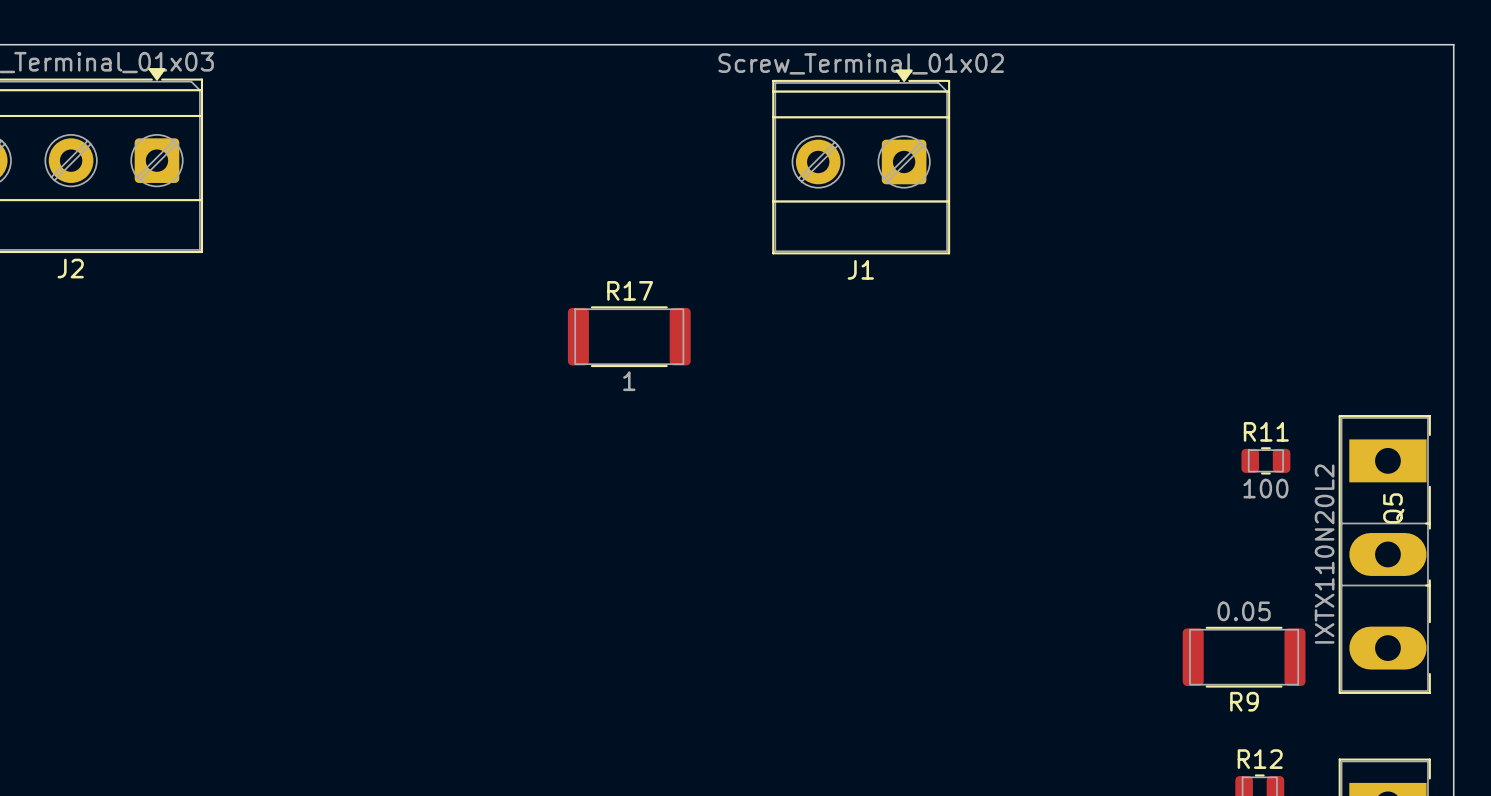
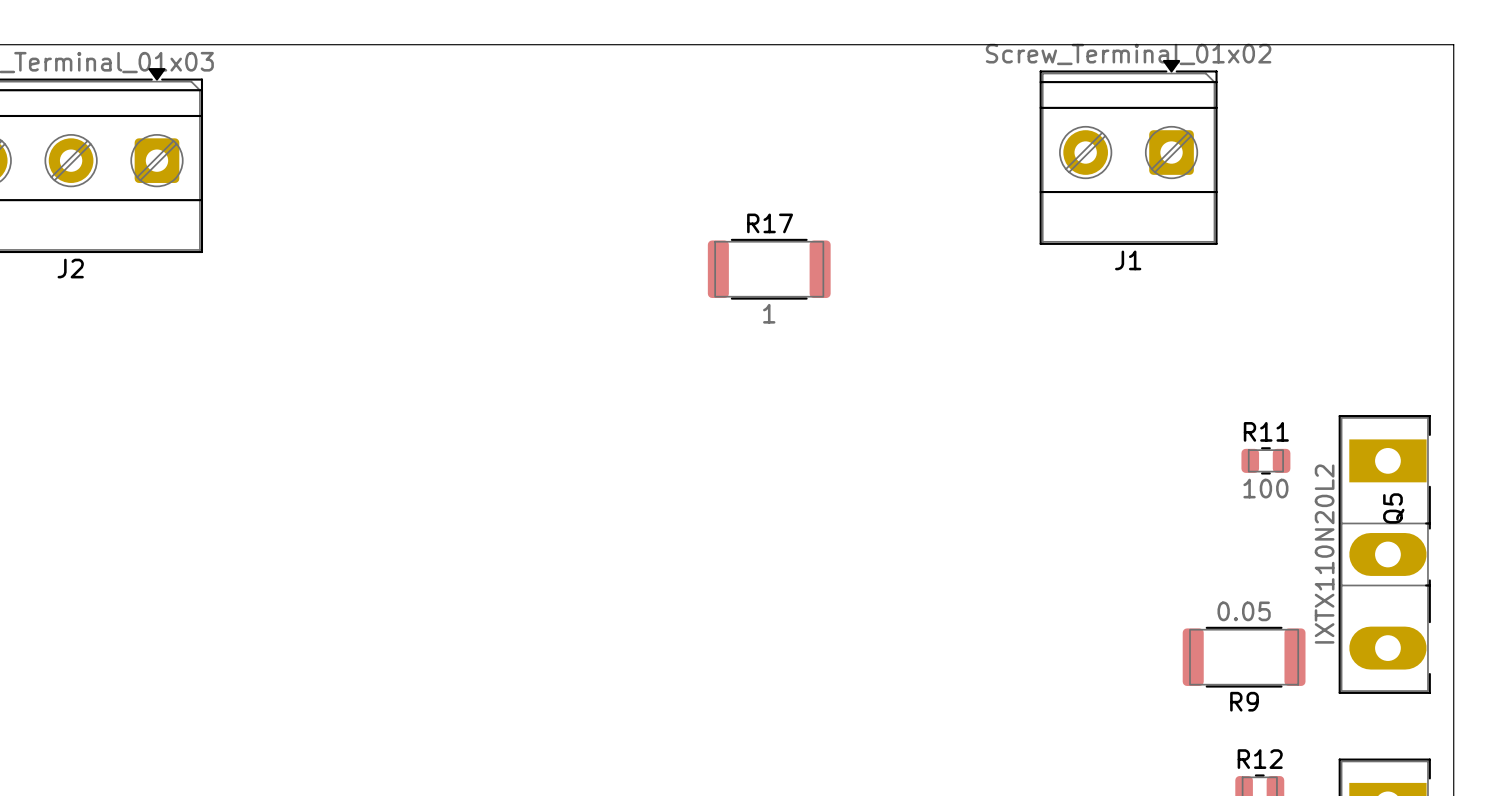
J1 position: (861, 161) -> (1128, 152)
R17 position: (629, 336) -> (769, 269)

